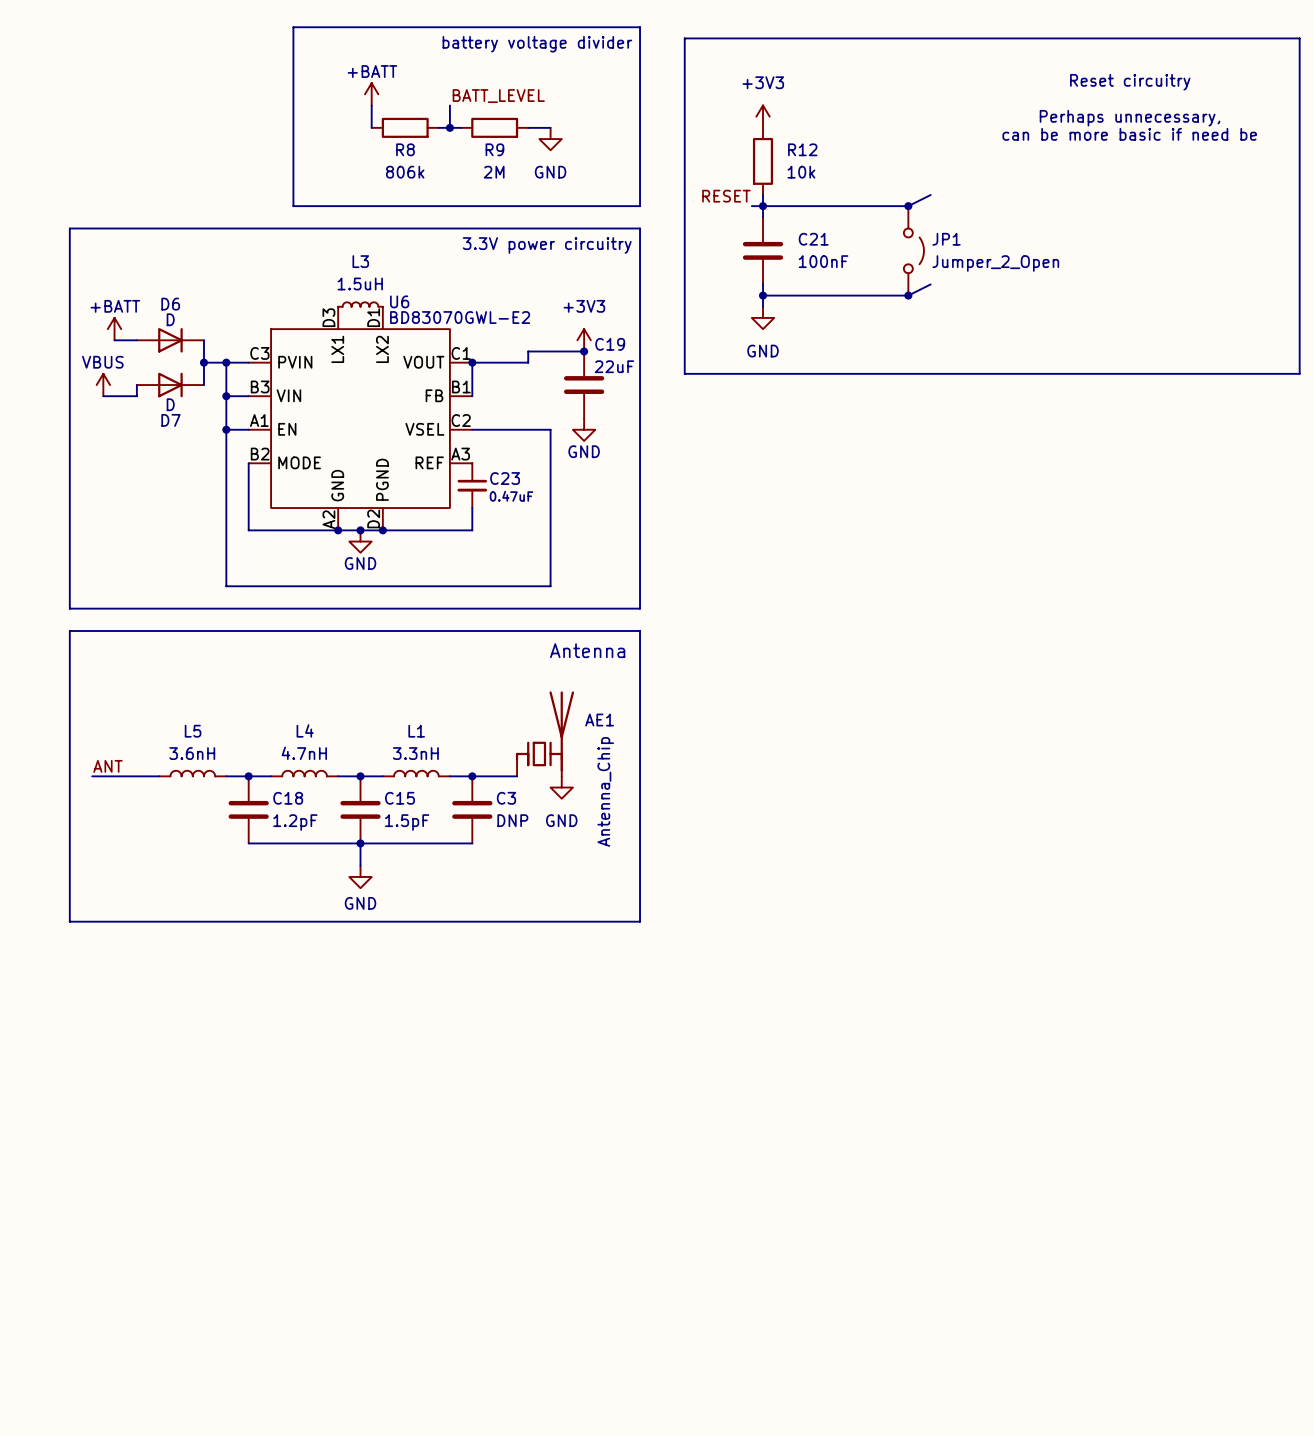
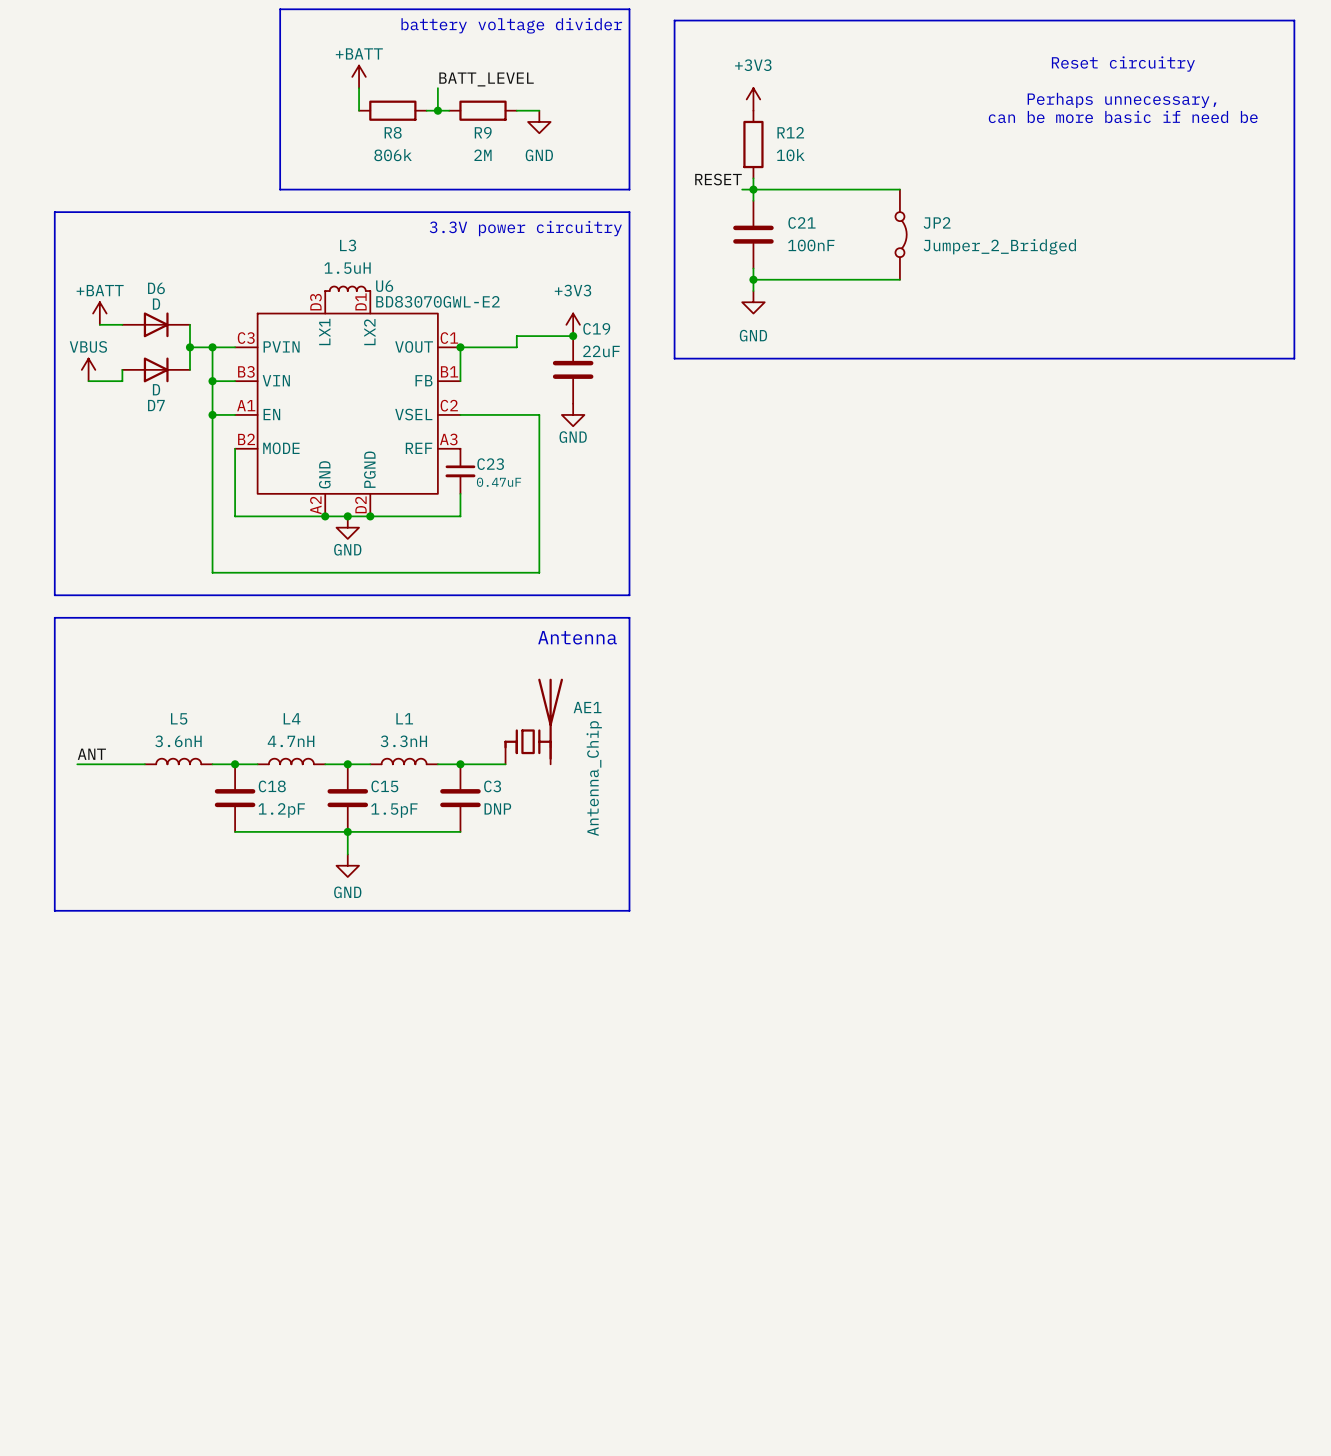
wire: (930, 194) (908, 206) -> none
junction: (908, 206) -> none
JP2: none -> Jumper_2_Bridged (901, 234)
JP1: Jumper_2_Open (913, 250) -> none
wire: (930, 284) (908, 295) -> none
junction: (908, 295) -> none
power symbol: GND (561, 787) -> none

